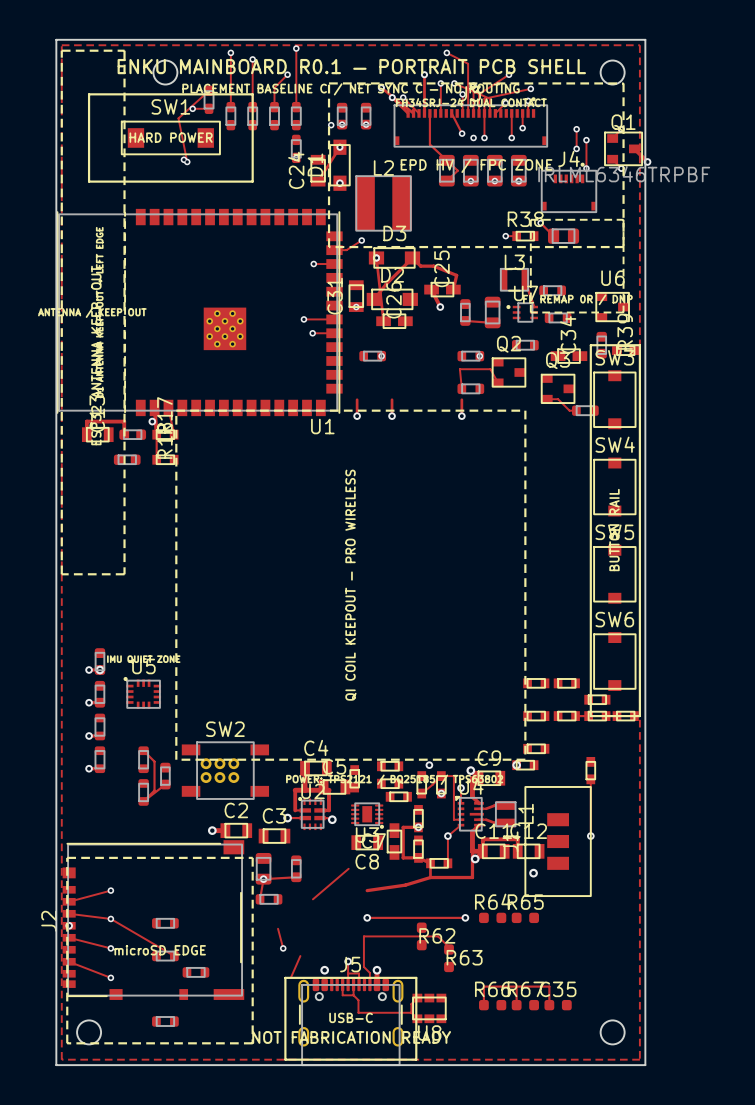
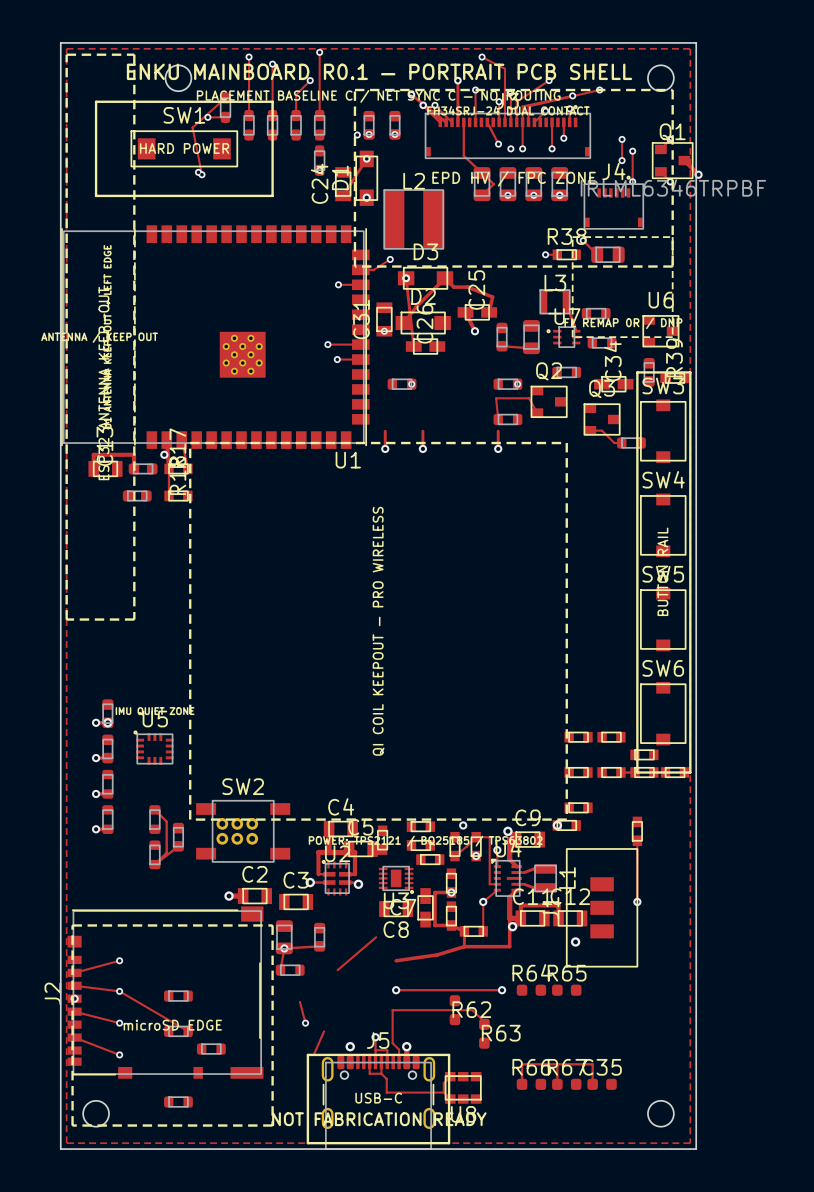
track: (454, 83) (489, 98) -> (599, 90) (528, 106)
via: (454, 83) -> none
via: none -> (599, 90)

